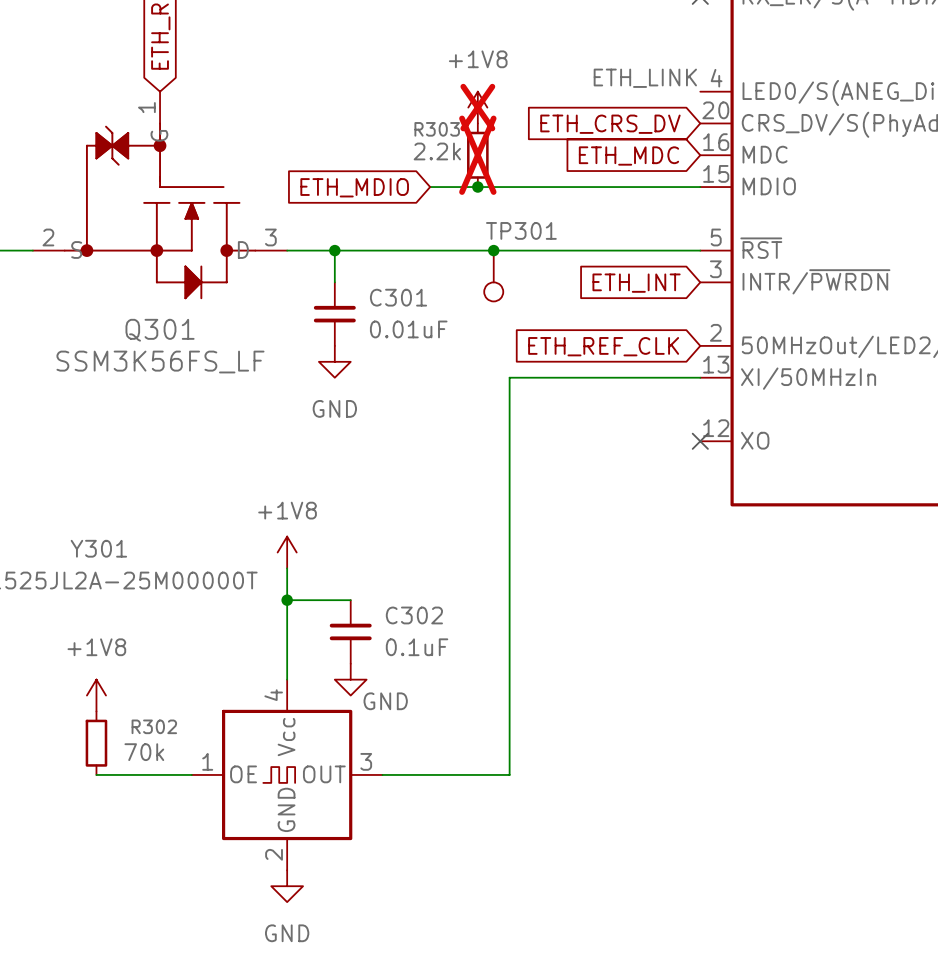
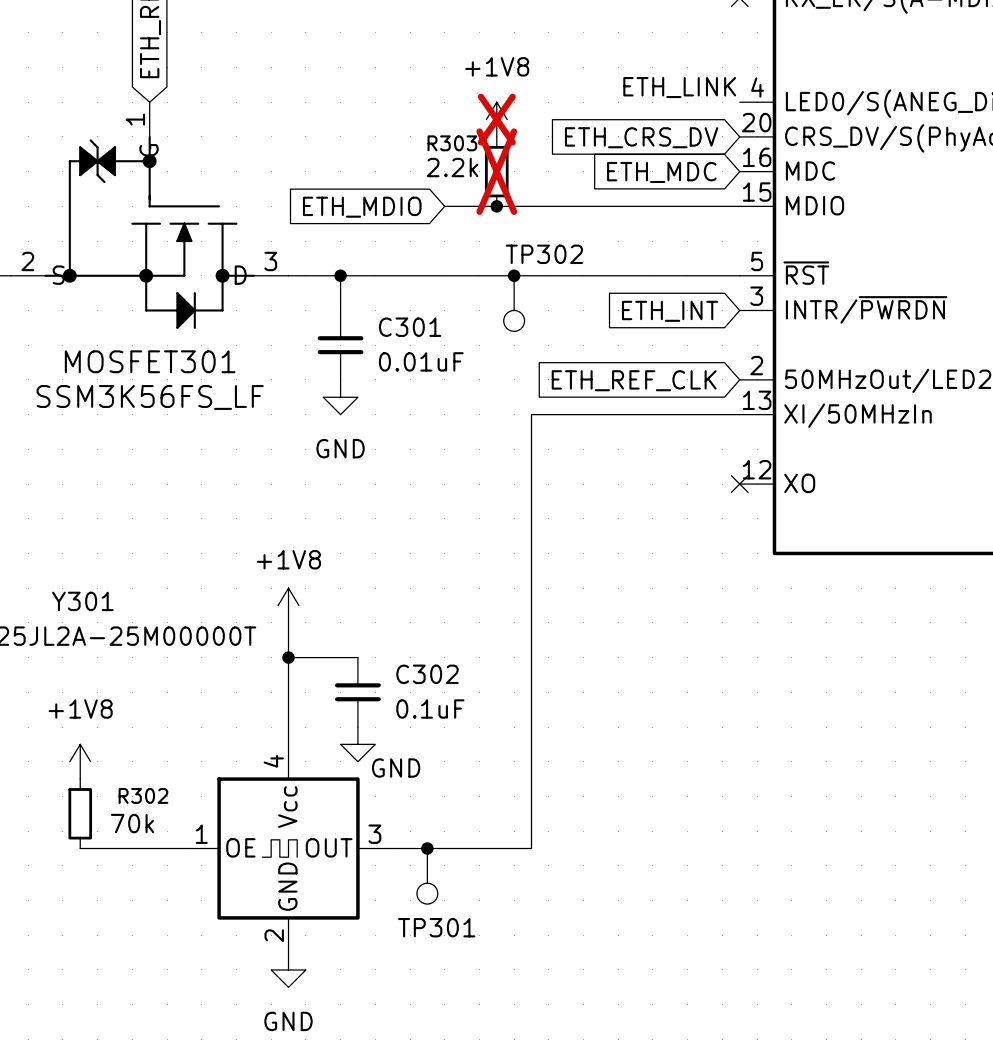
TP301 name: TP301 (521, 230) -> TP302 (544, 254)
Q301 name: Q301 (160, 330) -> MOSFET301 (150, 361)
junction: none -> (427, 848)
TP301: none -> (427, 876)

